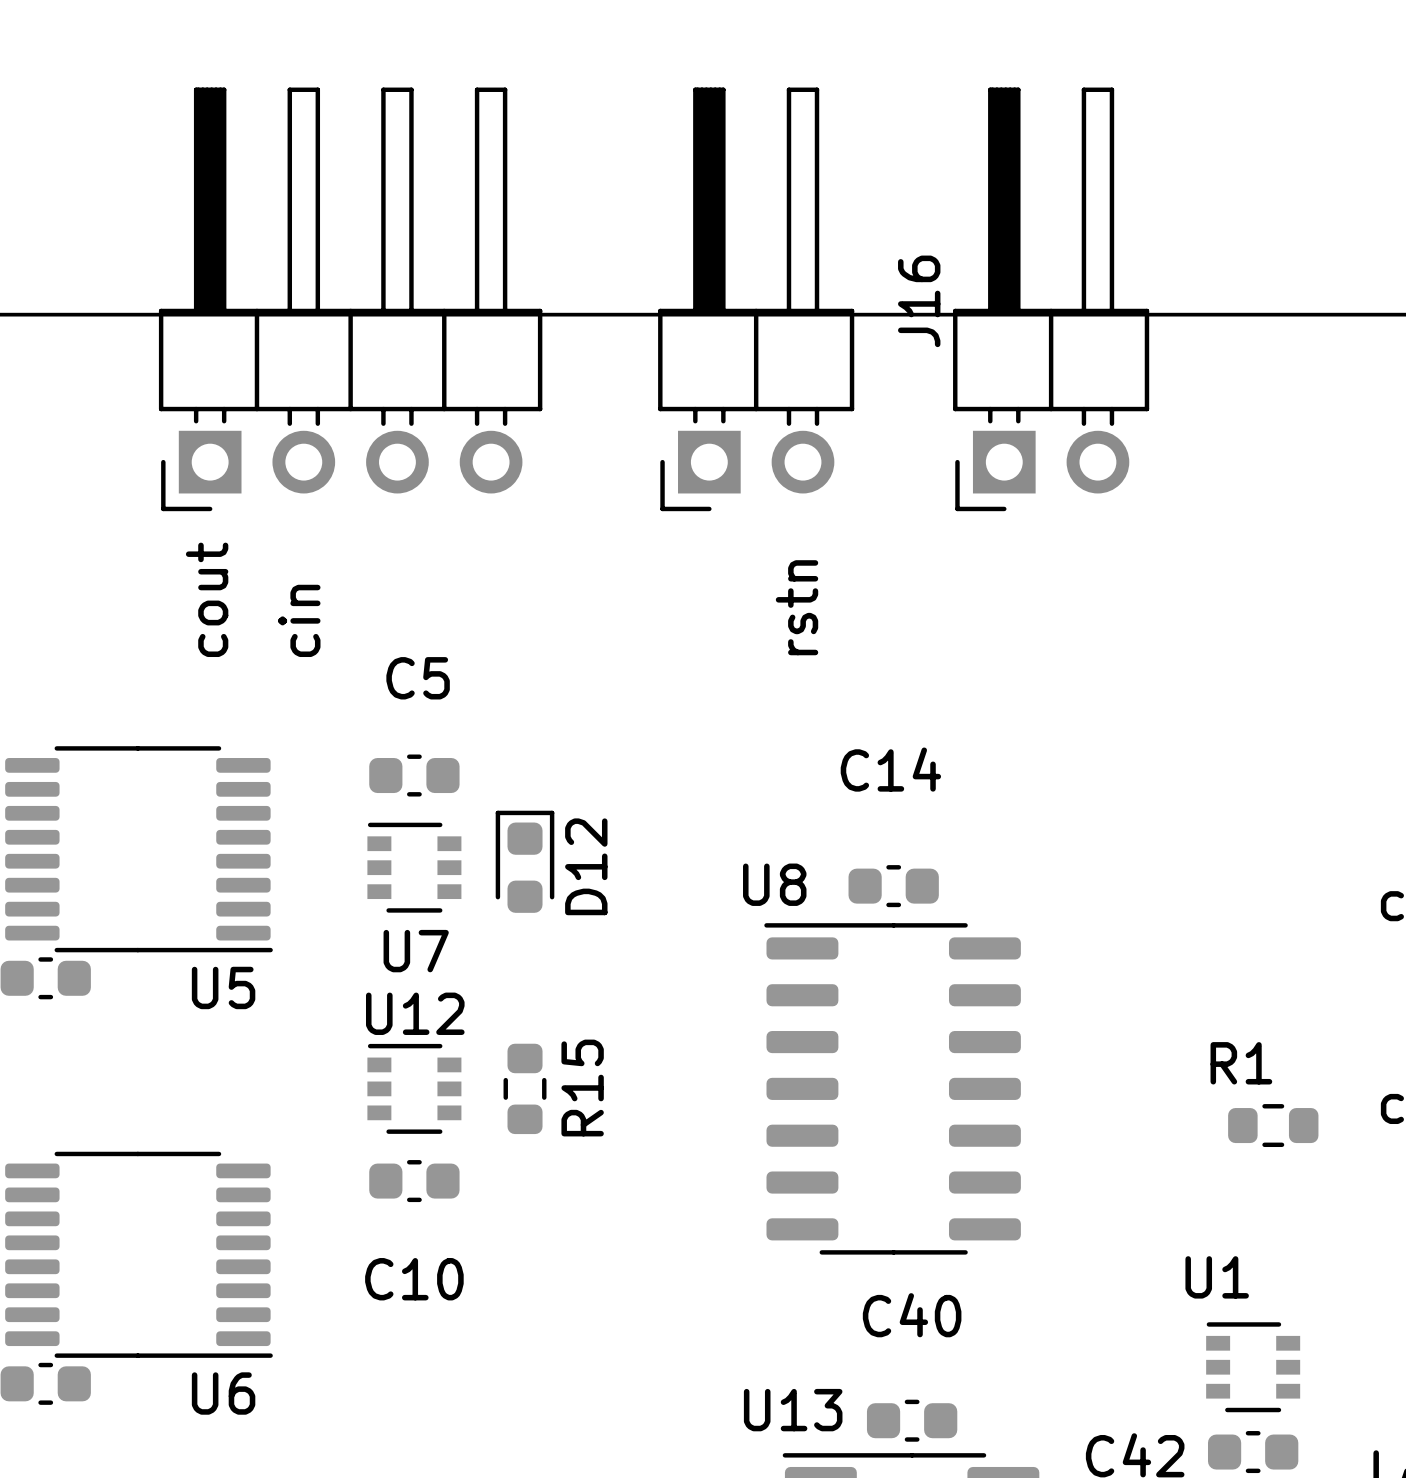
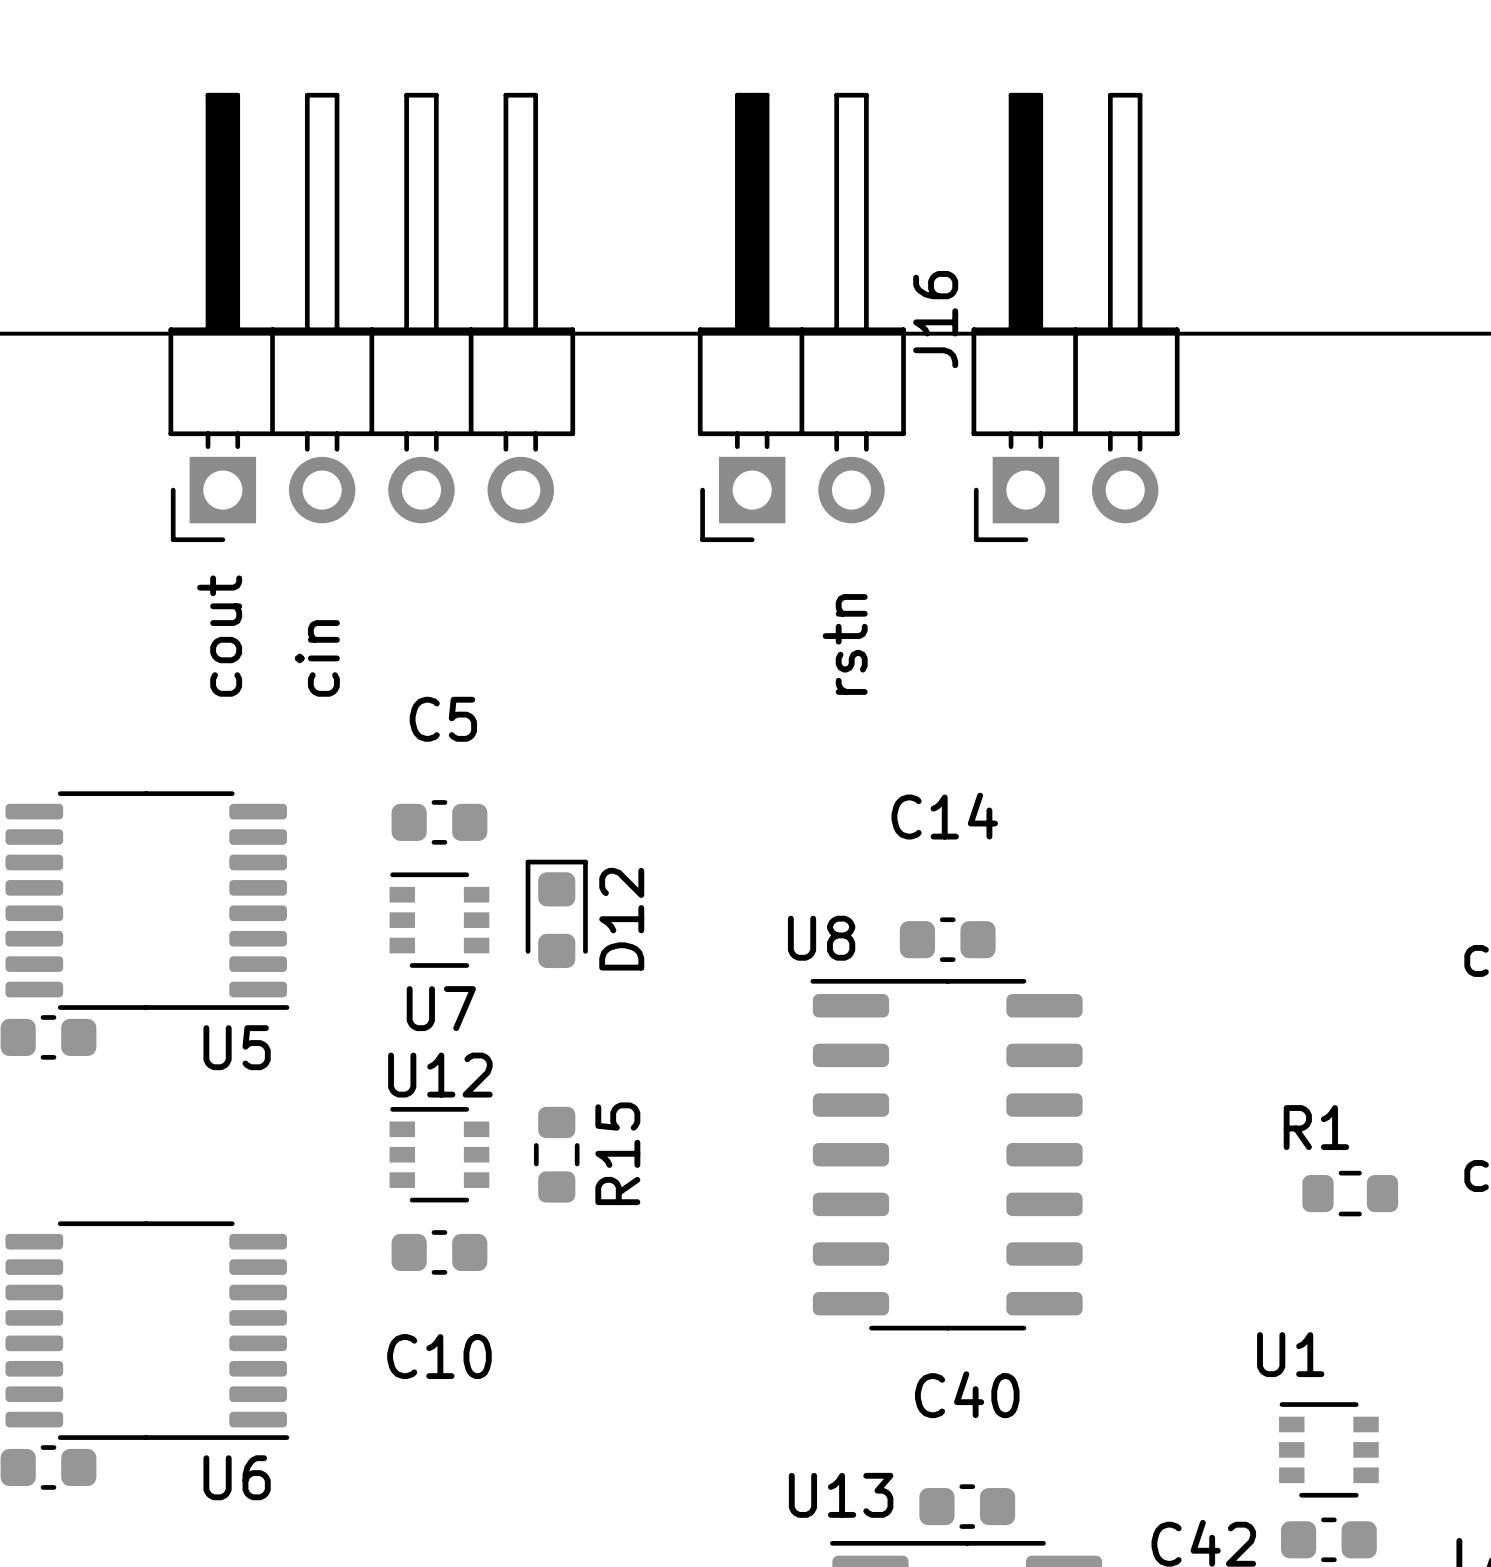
J16 position: (1051, 299) -> (1075, 317)

